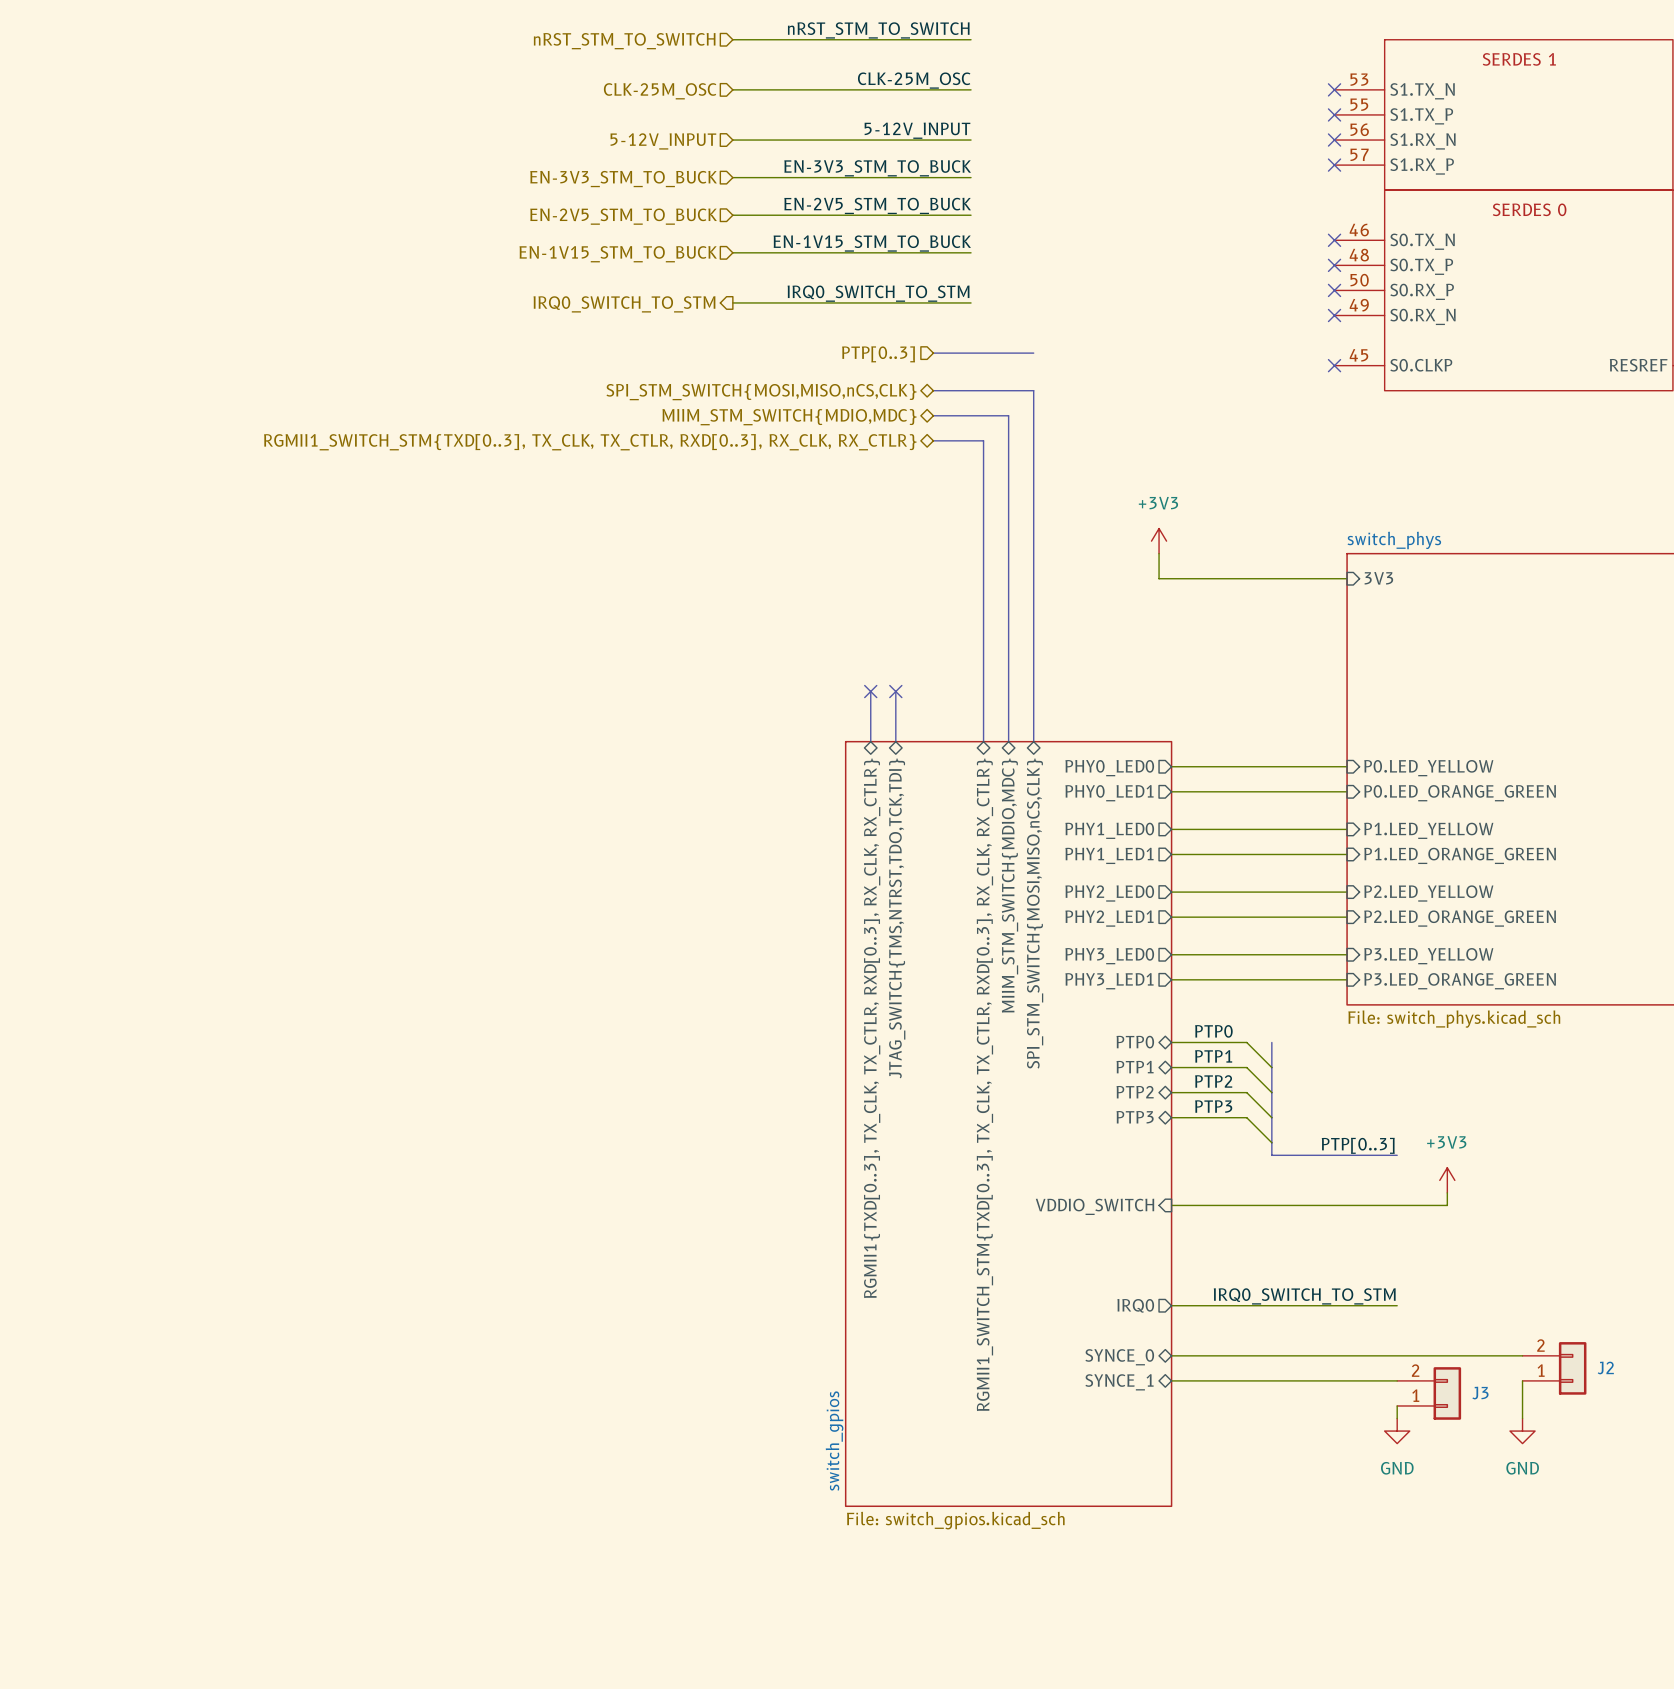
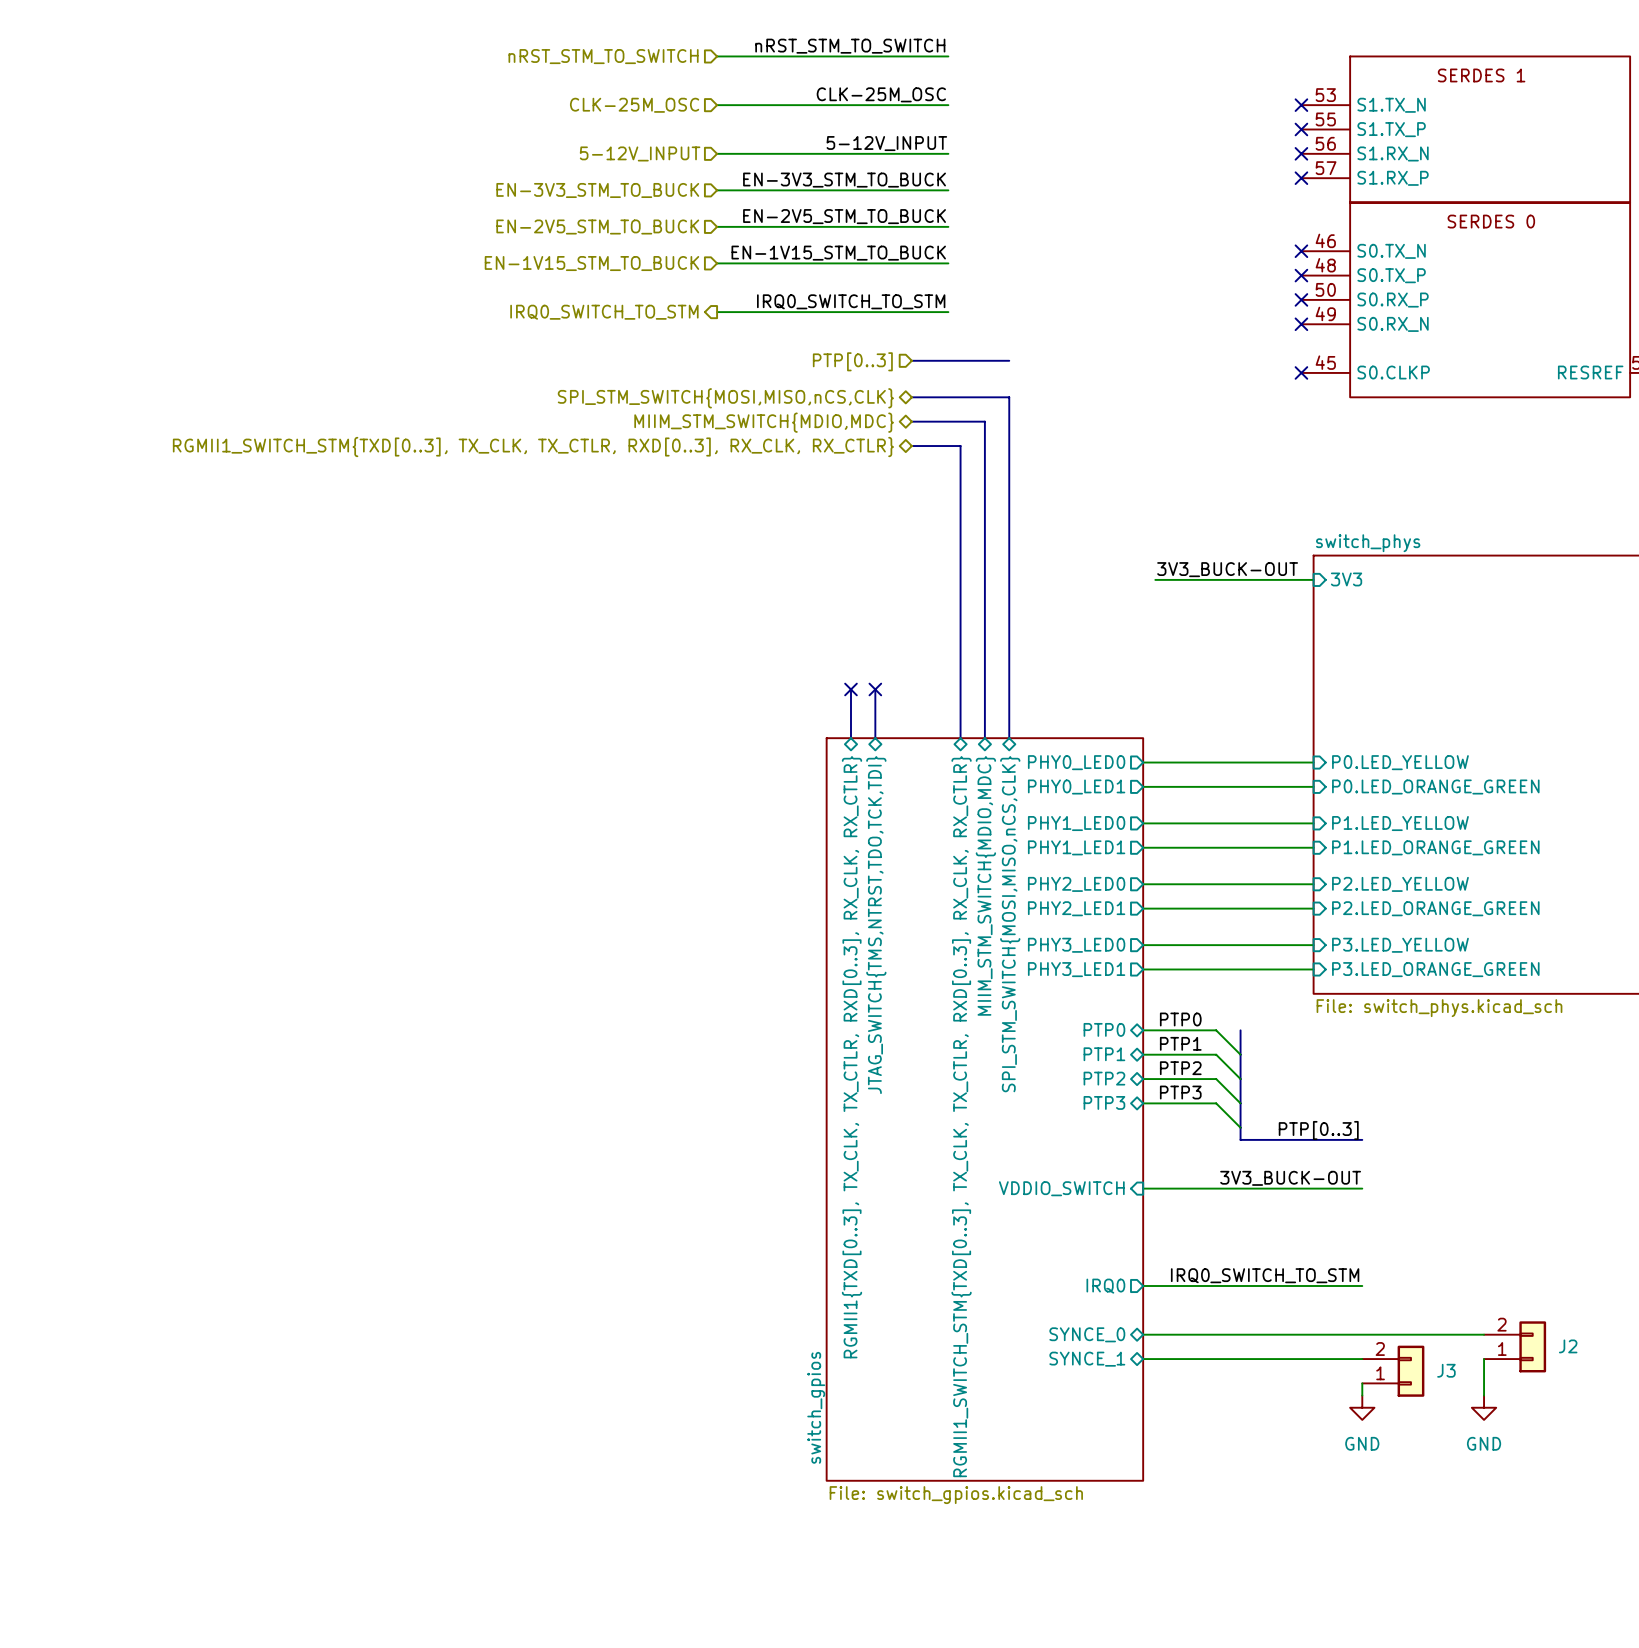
power symbol: +3V3 (1159, 541) -> none
wire: (1159, 553) (1159, 578) (1184, 578) -> none
label: none -> 3V3_BUCK-OUT (1227, 569)
power symbol: +3V3 (1447, 1180) -> none
wire: (1447, 1192) (1447, 1205) (1397, 1205) -> none
label: none -> 3V3_BUCK-OUT (1290, 1178)

